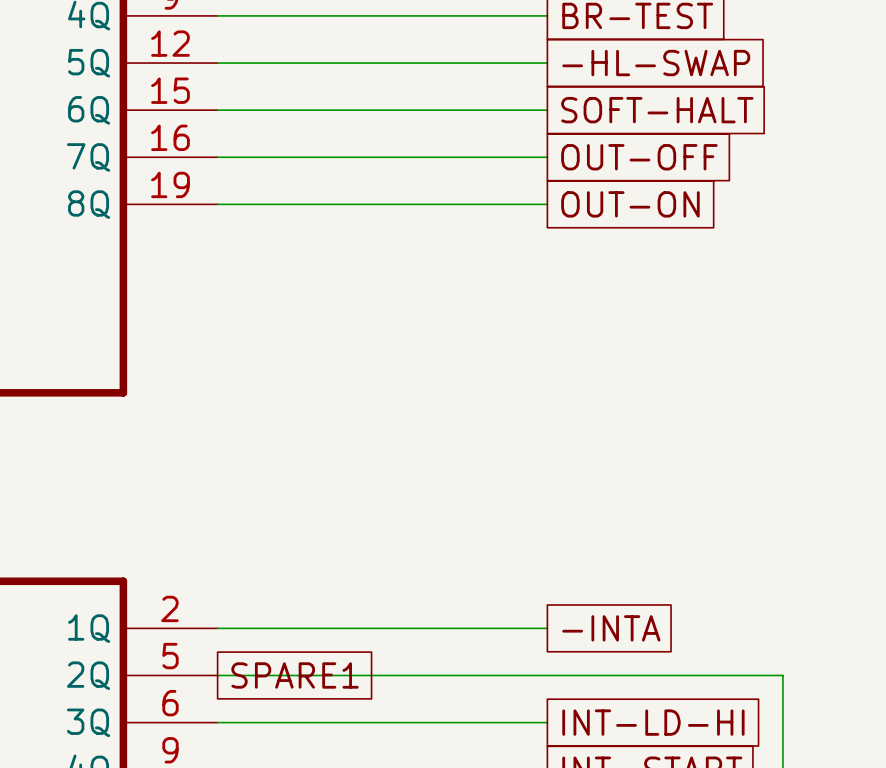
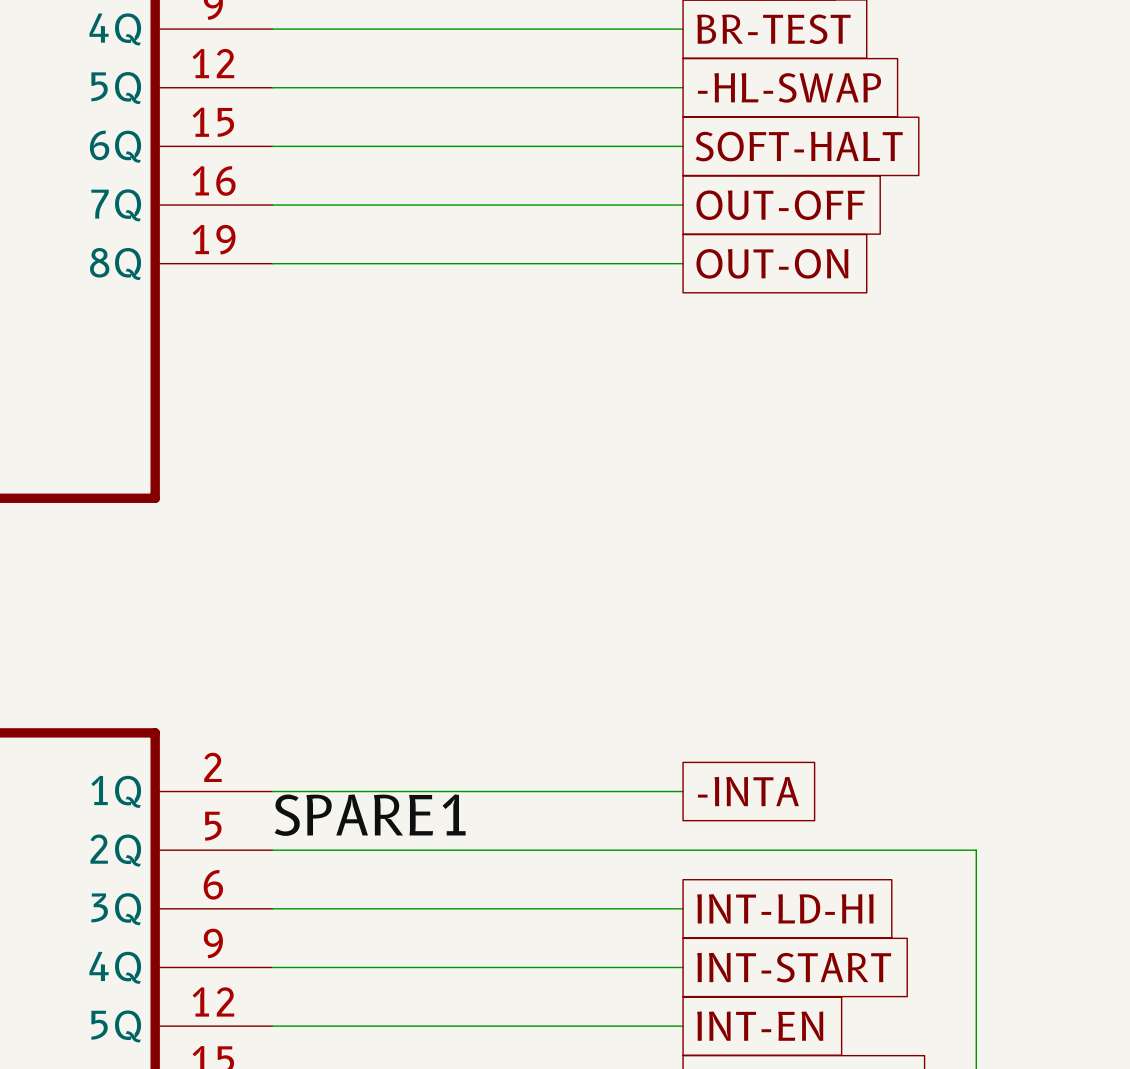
label: none -> SPARE1 (370, 815)
global label: SPARE1 (295, 675) -> none

